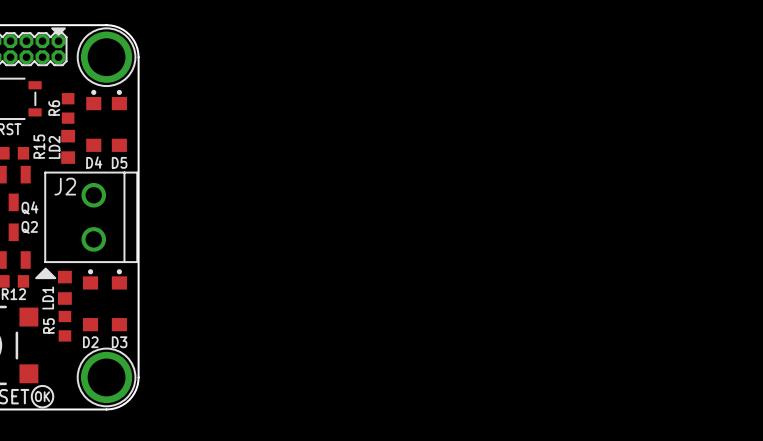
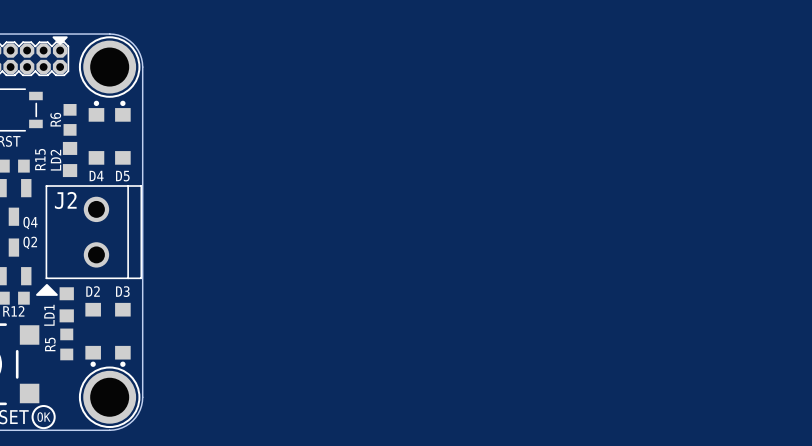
D2 rotation: 0° (90, 300) -> 180° (93, 334)
D3 rotation: 0° (119, 300) -> 180° (122, 334)

